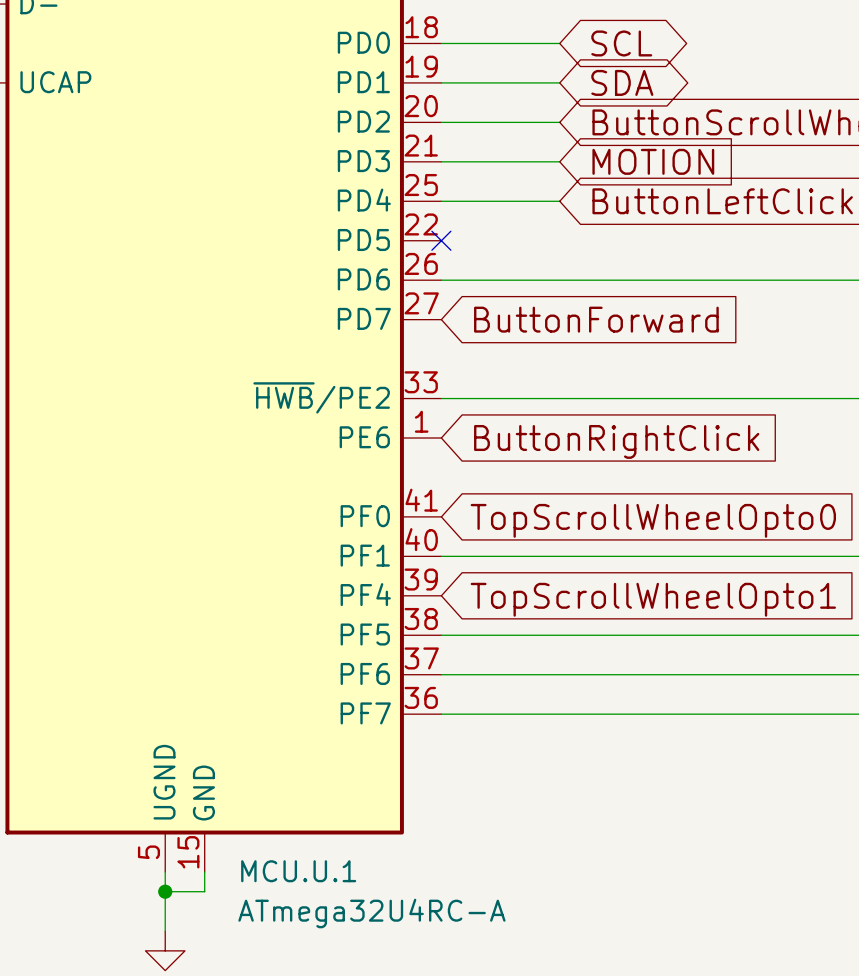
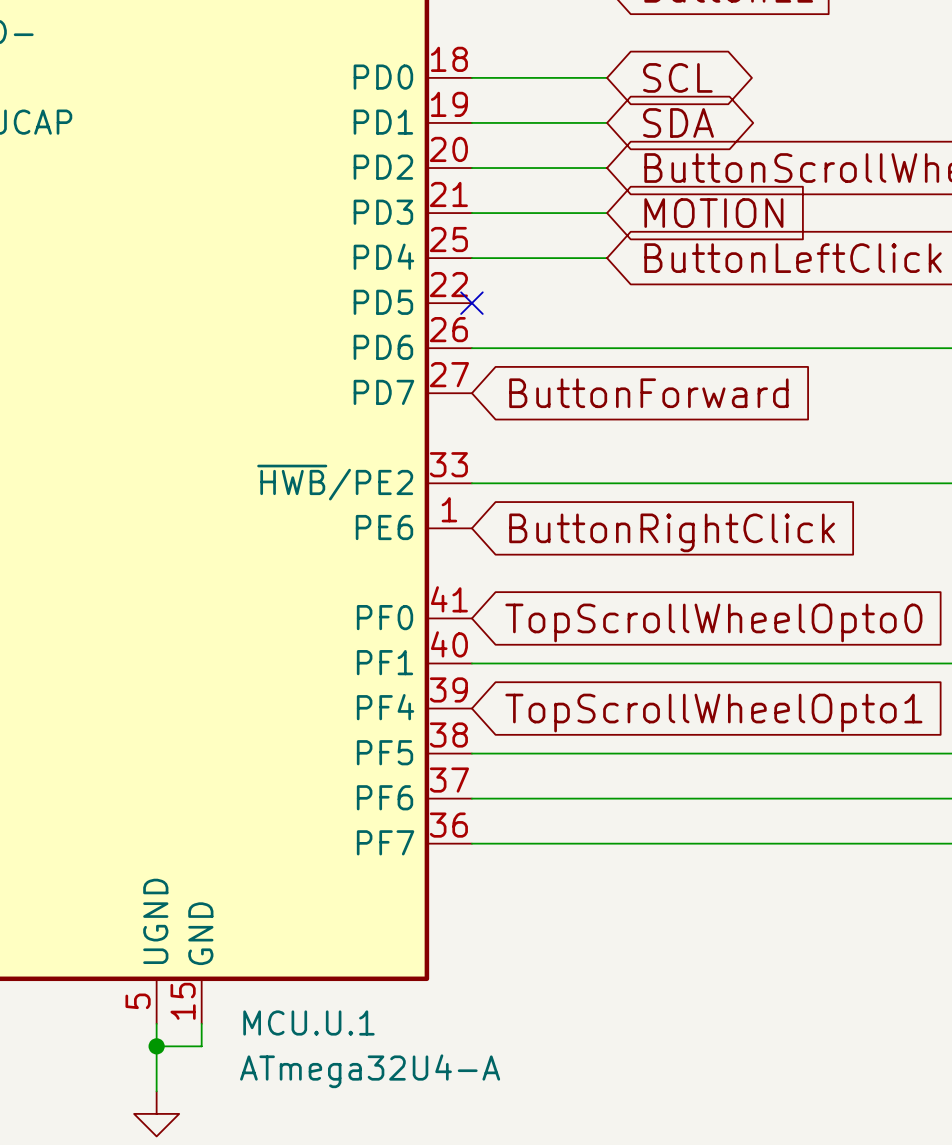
MCU.U.1 value: ATmega32U4RC-A (371, 913) -> ATmega32U4-A (370, 1071)

